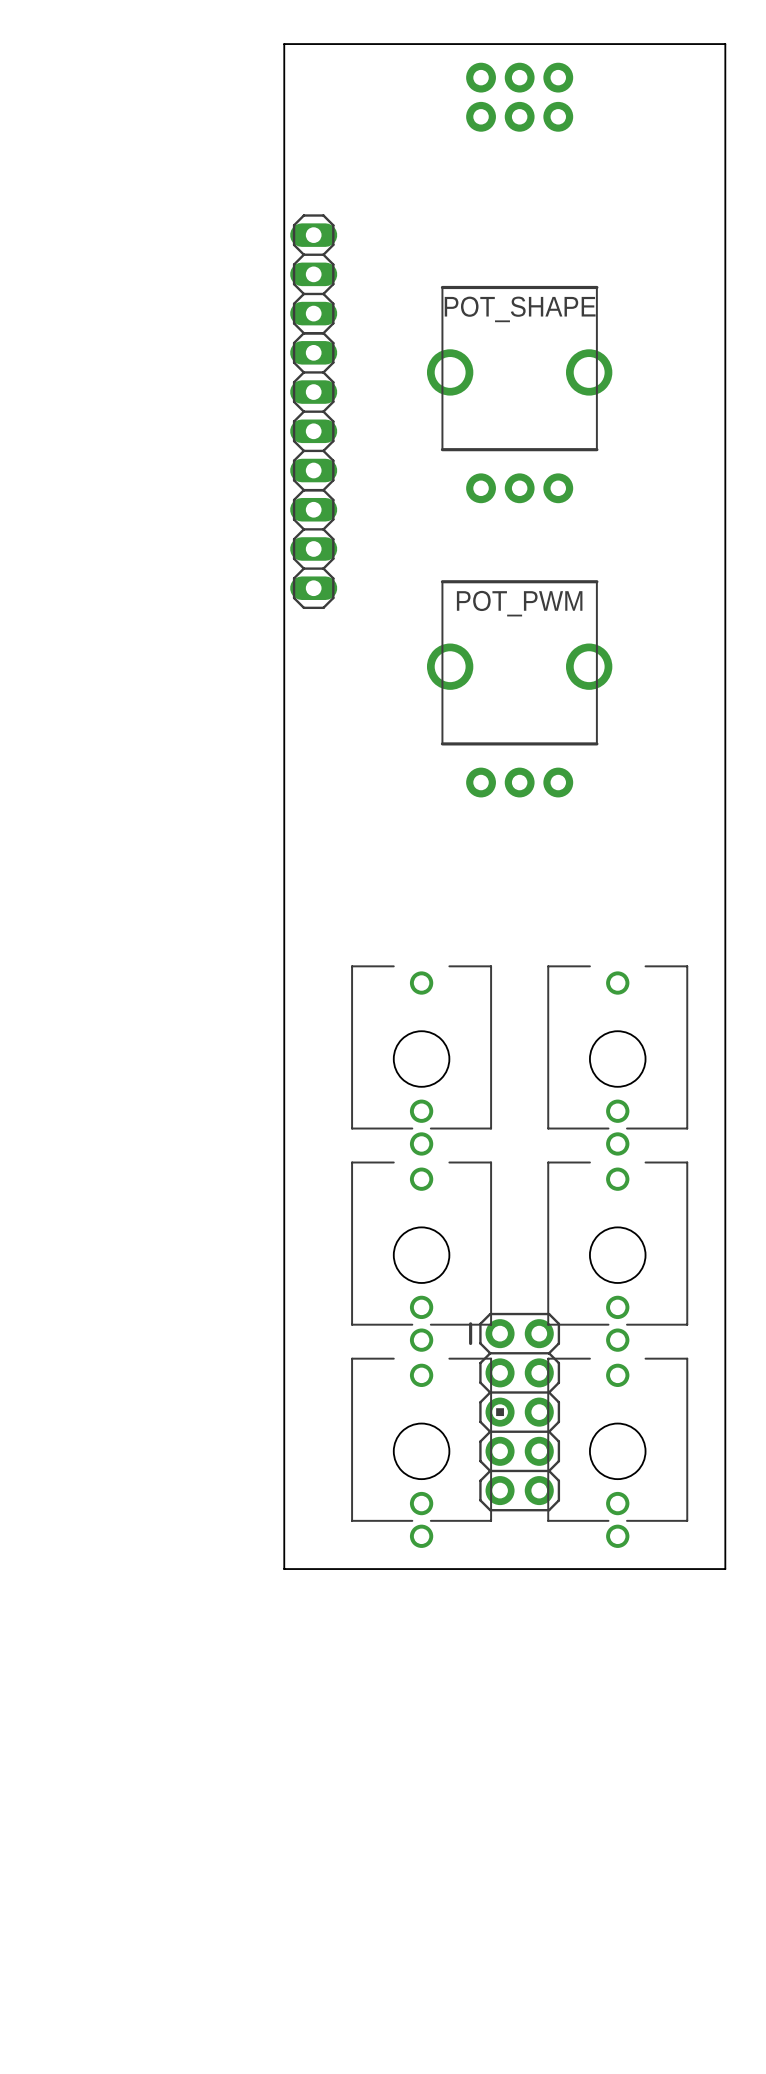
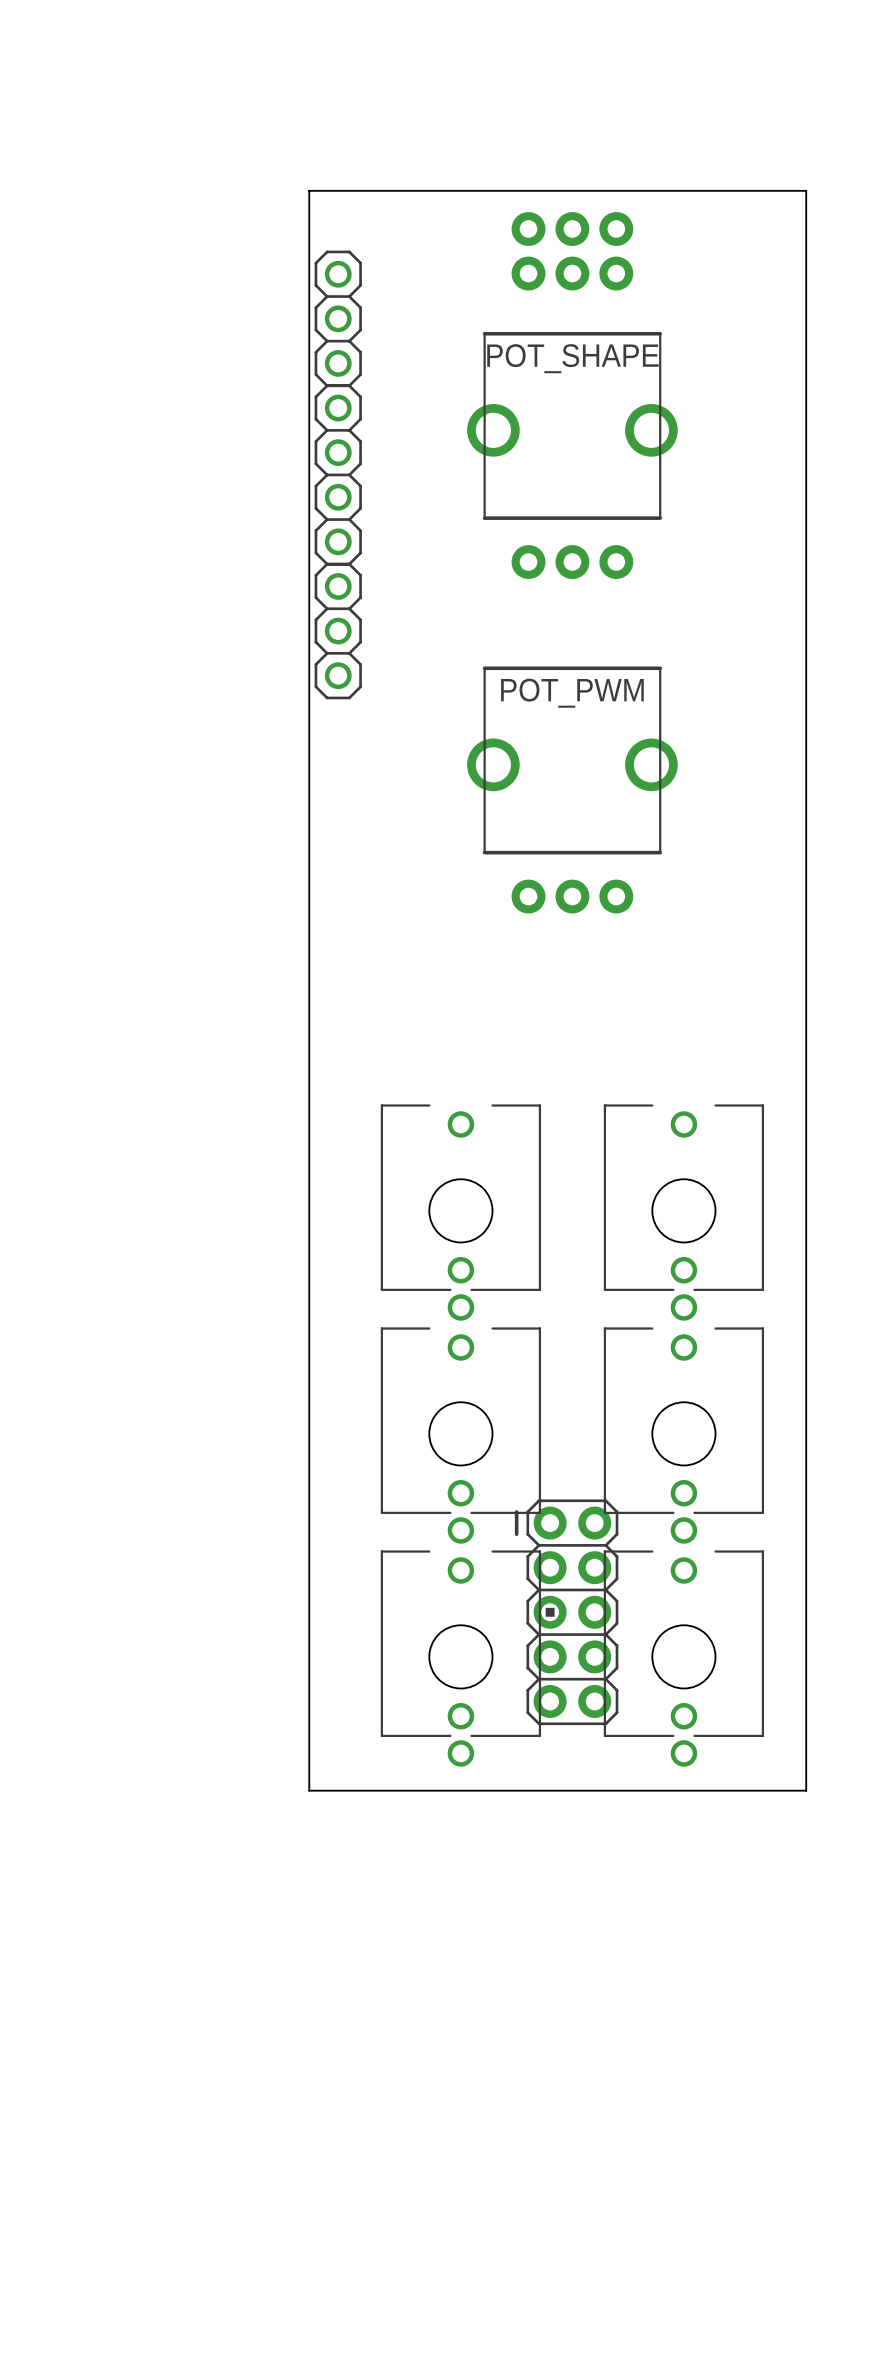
part position: (519, 97) -> (572, 251)
board edge: (725, 161) (725, 44) (284, 44) (284, 1569) (288, 1569) -> (806, 190) (309, 190) (309, 1790)
part footprint: [290, 214, 338, 335] -> [314, 250, 362, 388]
part footprint: [290, 332, 338, 492] -> [314, 384, 362, 566]
part footprint: [290, 488, 338, 610] -> [314, 562, 362, 700]

